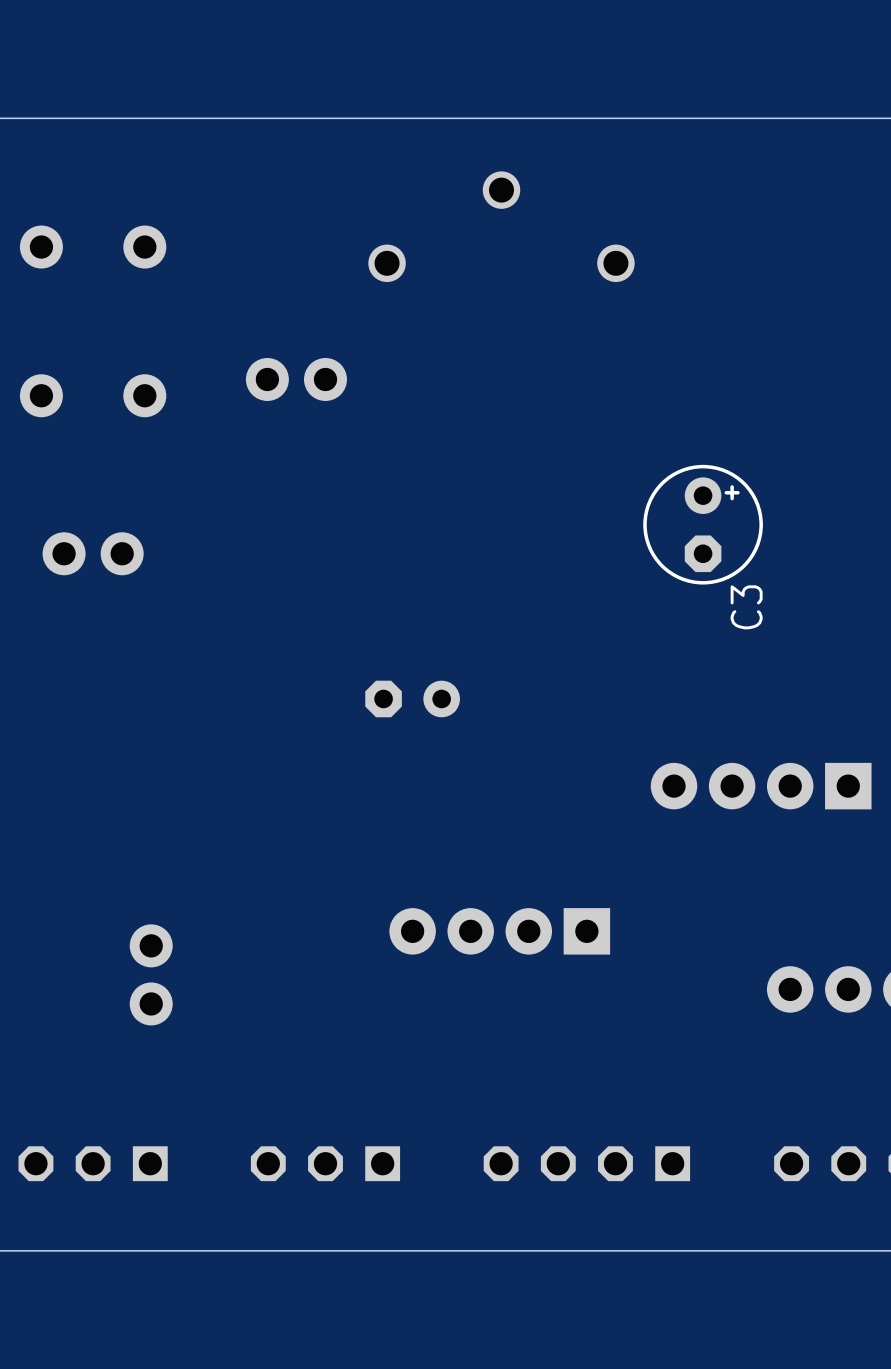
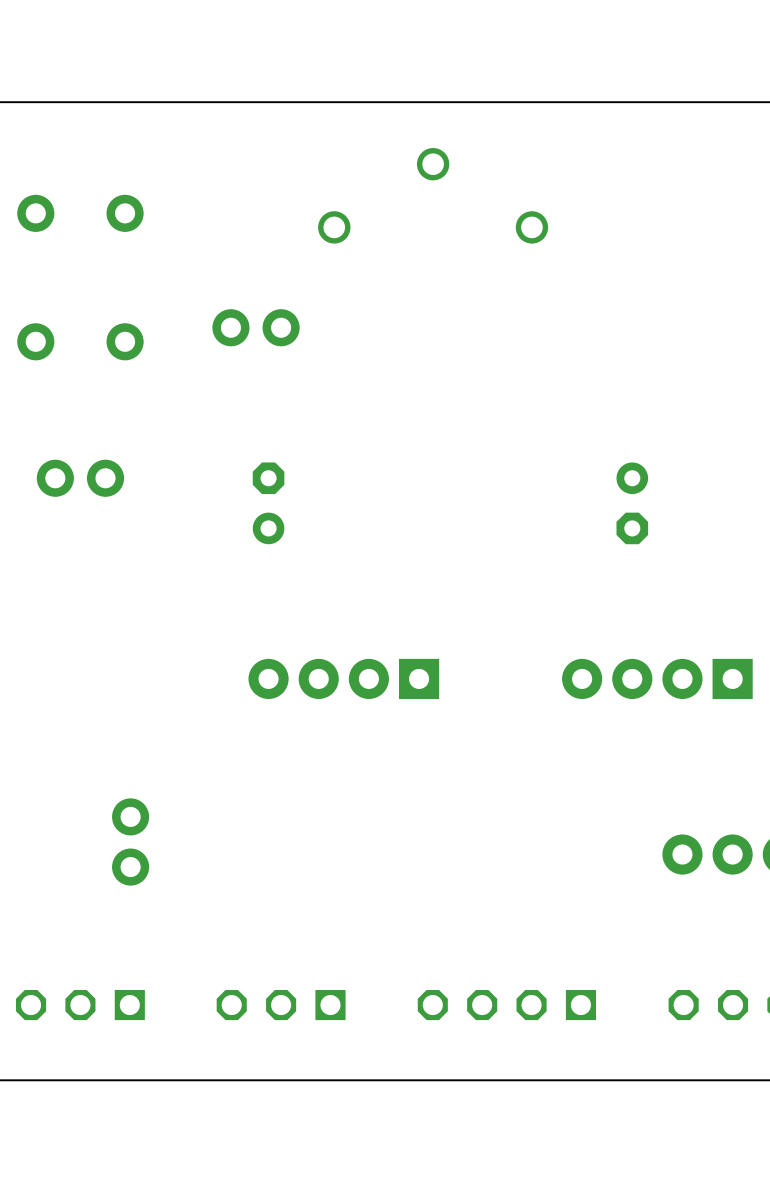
C3 side: bottom (703, 524) -> top (632, 503)
part rotation: 0° (412, 698) -> 90° clockwise (268, 503)
part position: (412, 698) -> (268, 503)
part position: (499, 931) -> (343, 678)

